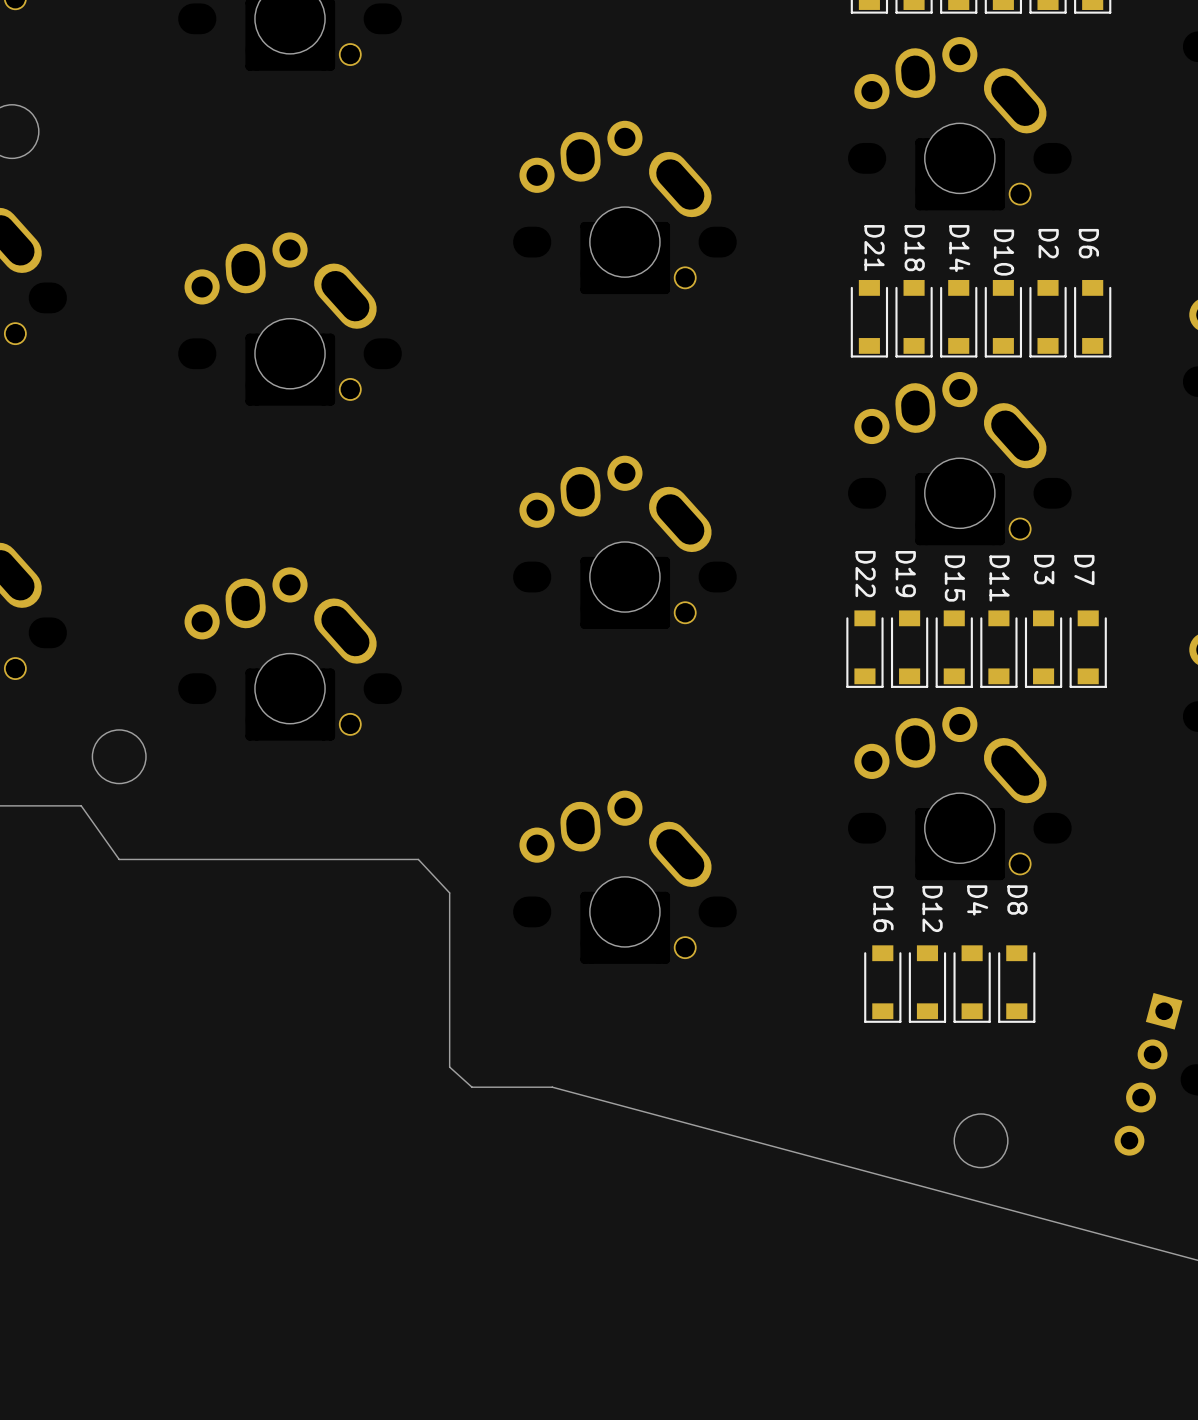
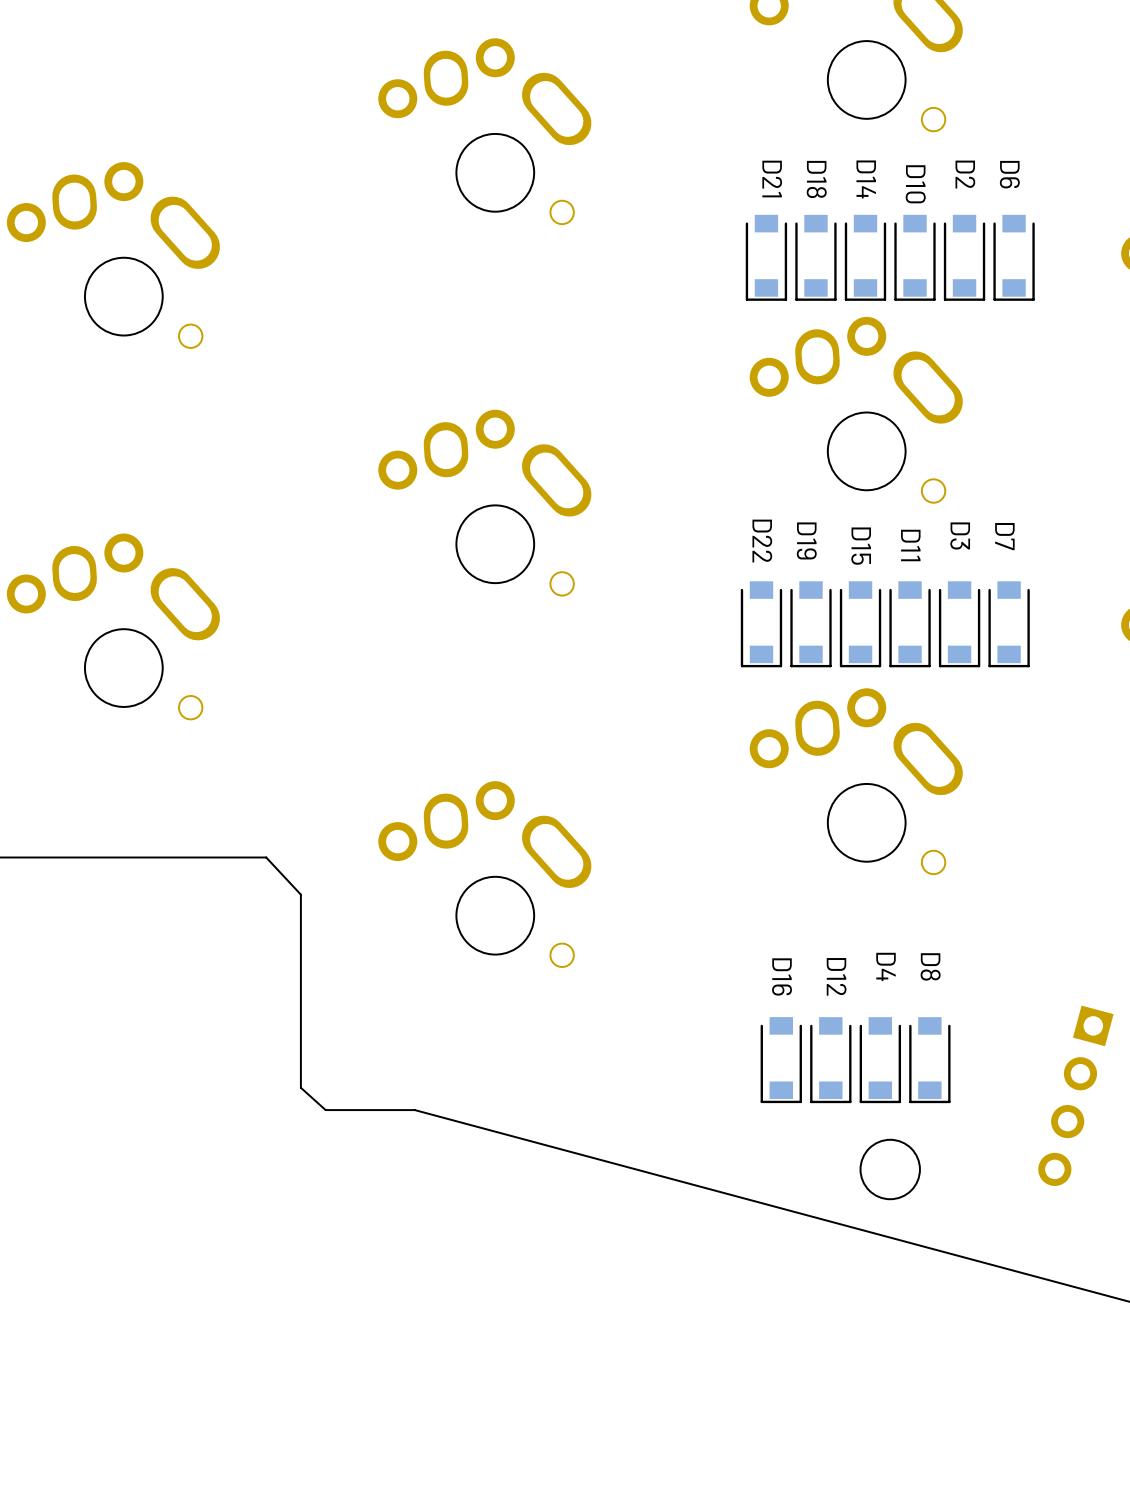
D16 position: (882, 984) -> (781, 1060)
D12 position: (927, 984) -> (830, 1060)
D4 position: (972, 984) -> (880, 1060)
D8 position: (1016, 984) -> (929, 1060)

